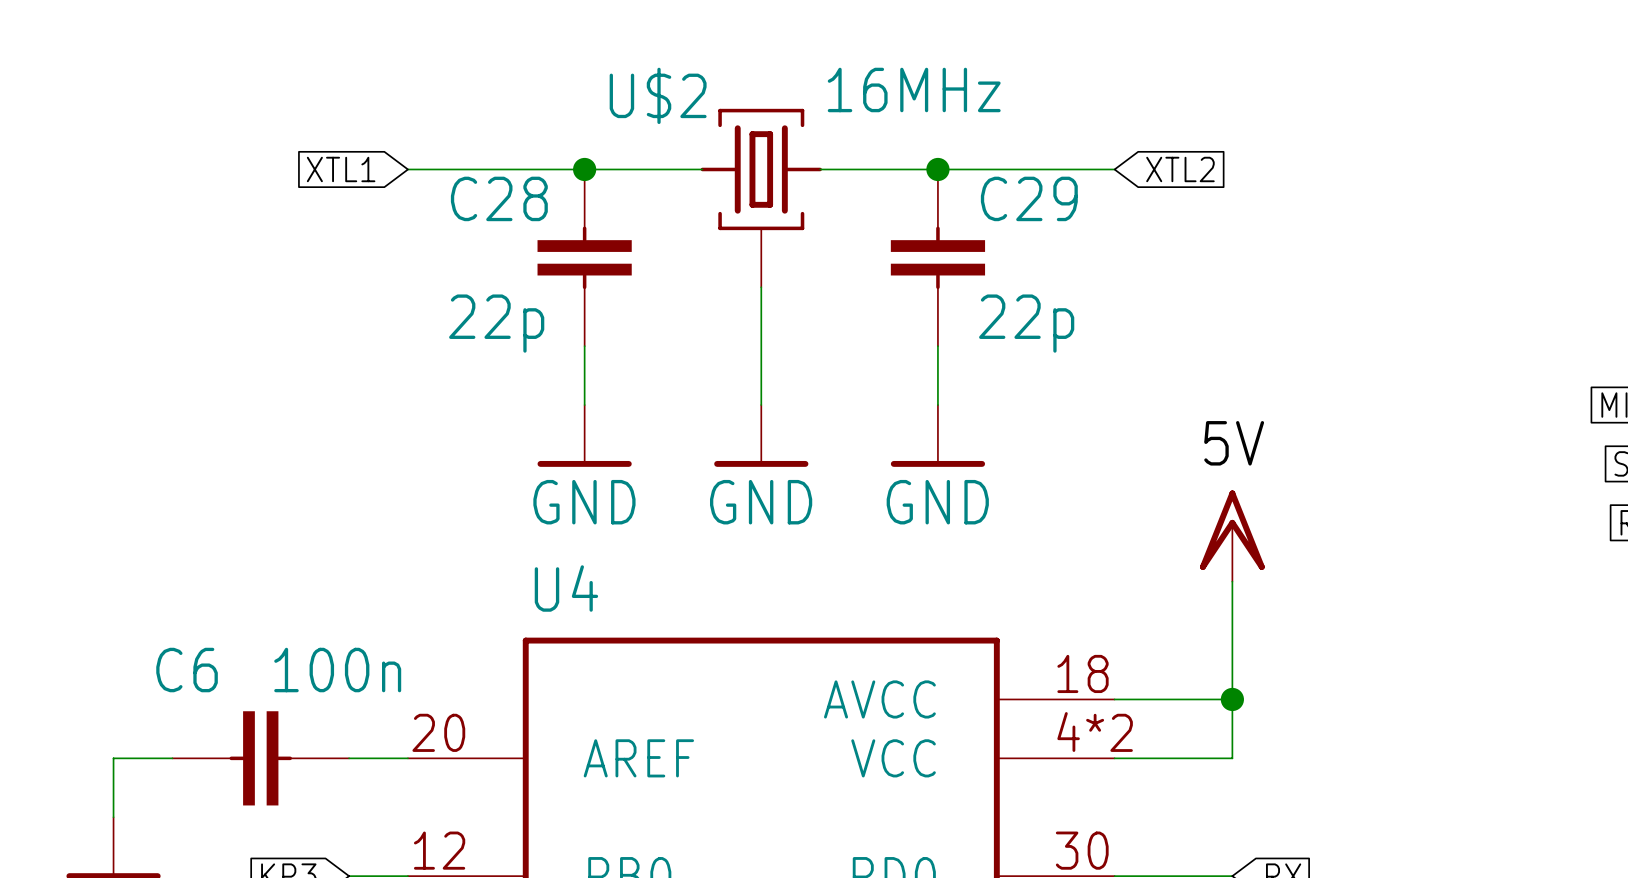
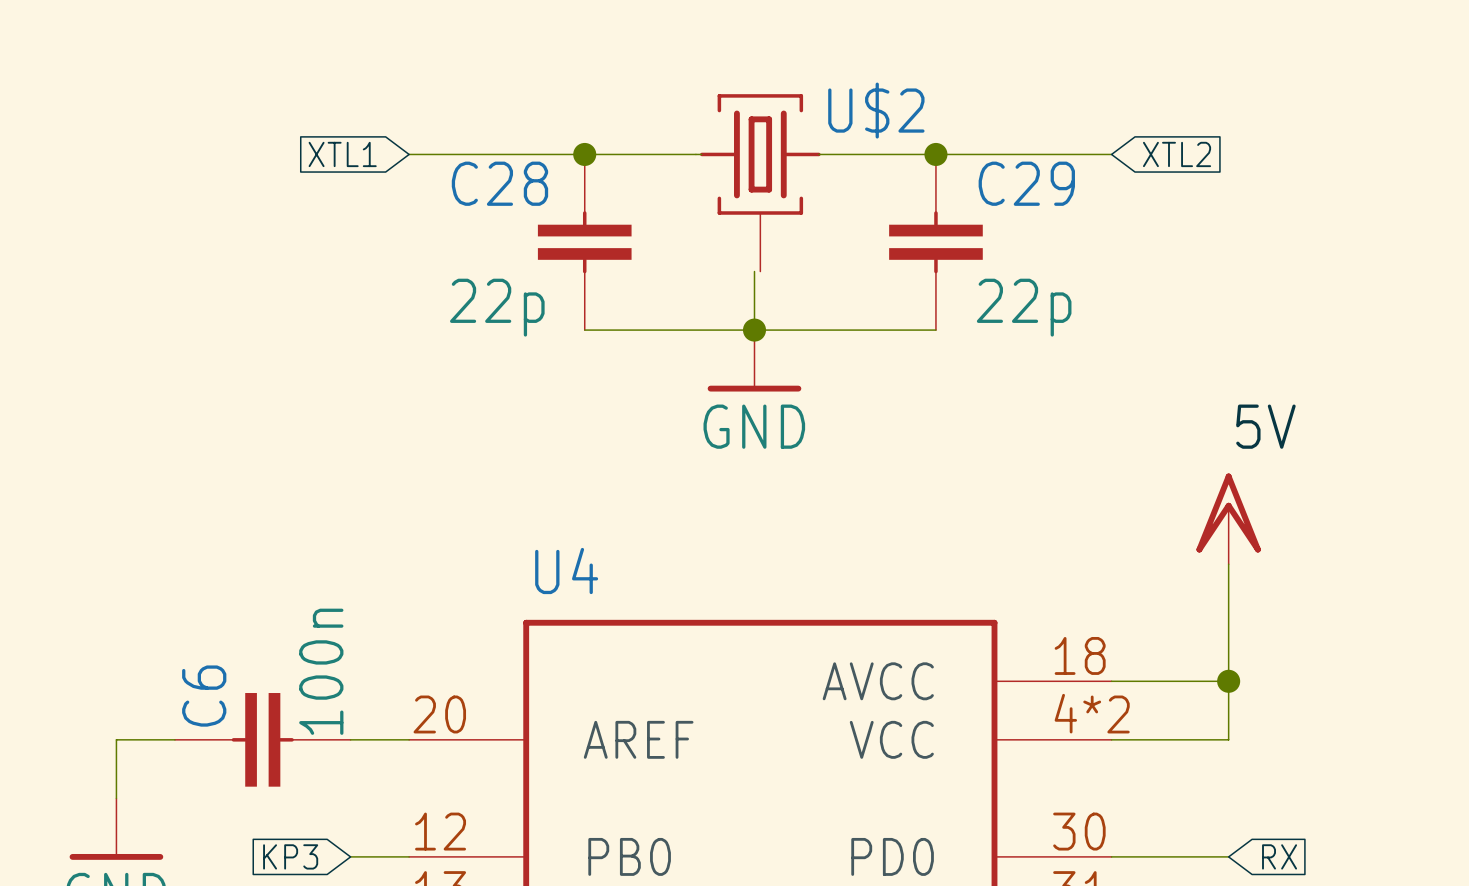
U$2 value: 16MHz (914, 89) -> none
U$2 name position: U$2 (658, 95) -> U$2 (876, 110)
wire: (761, 287) (761, 405) -> none
wire: (584, 346) (584, 405) -> (584, 330) (935, 330)
junction: none -> (754, 330)
wire: (937, 346) (937, 405) -> (754, 271) (754, 330)
power symbol: GND (584, 435) -> none
power symbol position: GND (761, 435) -> GND (754, 360)
power symbol: GND (937, 435) -> none
label position: 5V (1234, 443) -> 5V (1265, 426)
C6 name rotation: 0° (187, 670) -> 90° counterclockwise (204, 696)
C6 value rotation: 0° (337, 670) -> 90° counterclockwise (321, 671)

